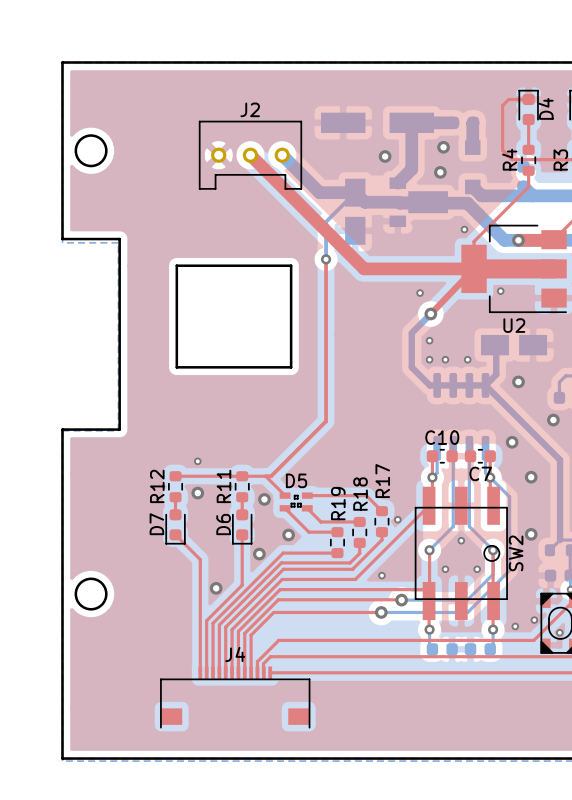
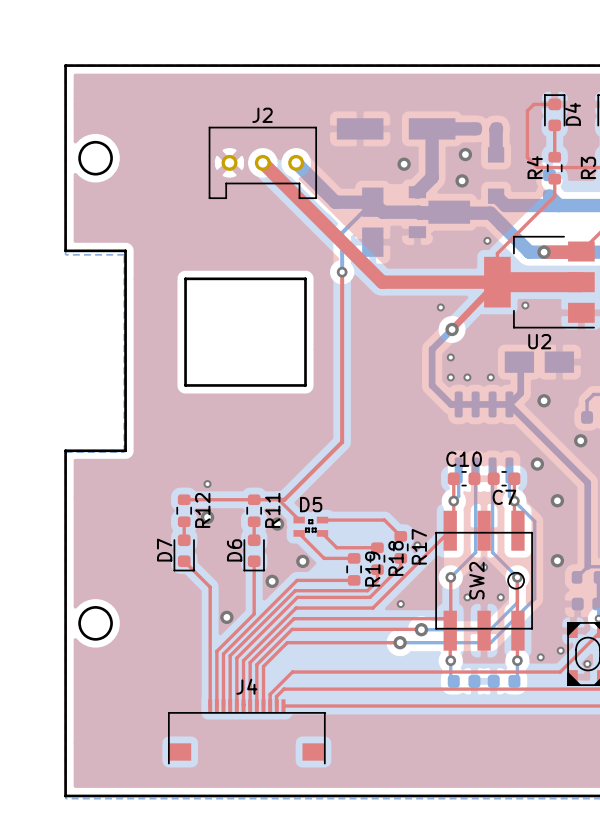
R17 name position: R17 (382, 481) -> R17 (419, 546)
R12 name position: R12 (157, 486) -> R12 (202, 510)
R11 name position: R11 (223, 486) -> R11 (272, 510)
R18 name position: R18 (360, 494) -> R18 (396, 558)
R19 name position: R19 (338, 503) -> R19 (372, 569)
SW2 name position: SW2 (516, 553) -> SW2 (476, 580)

